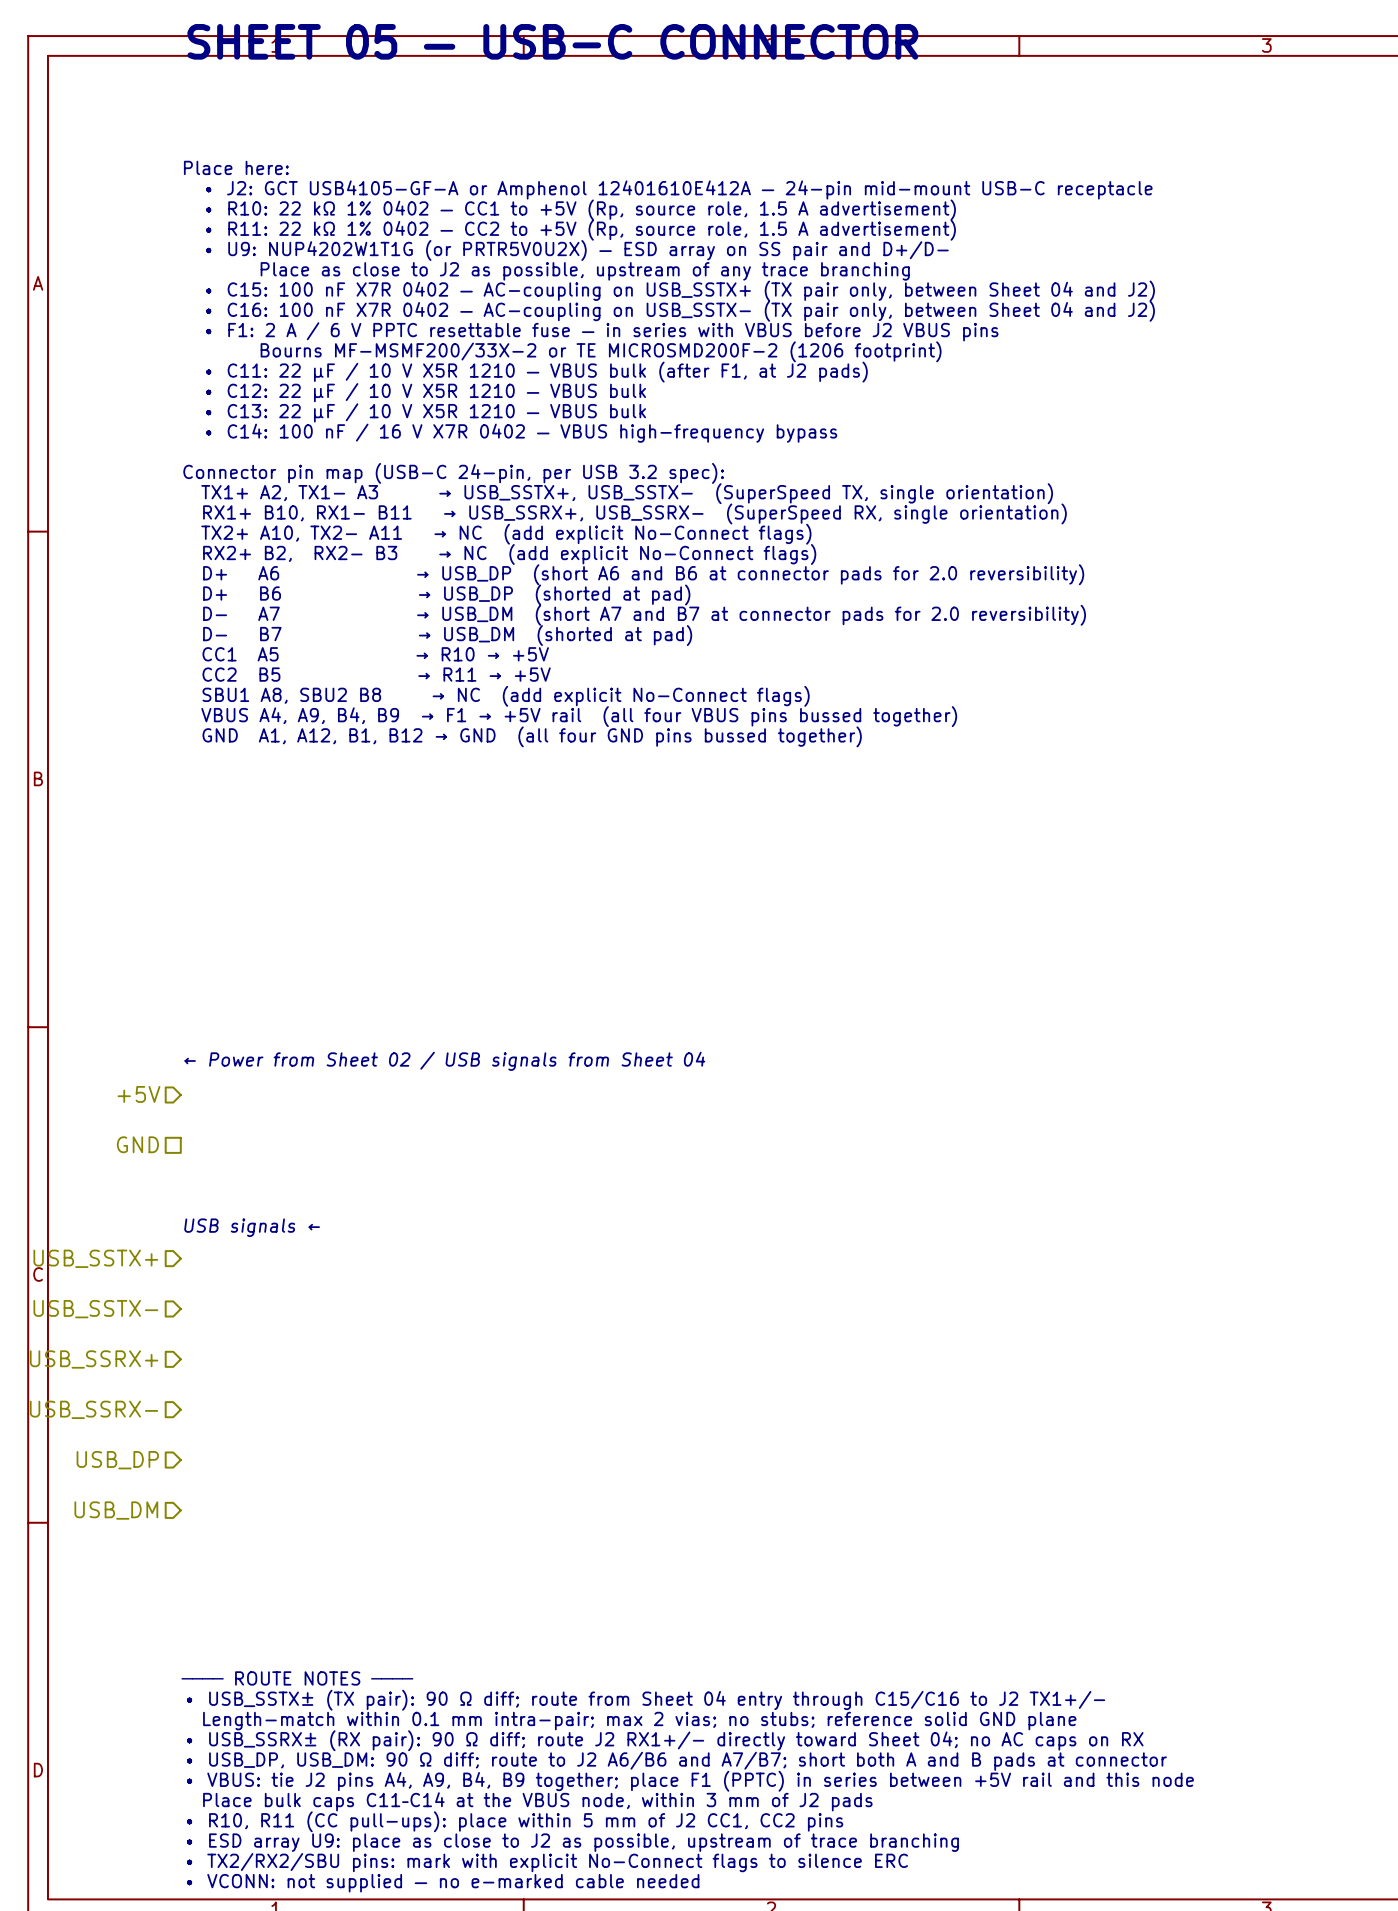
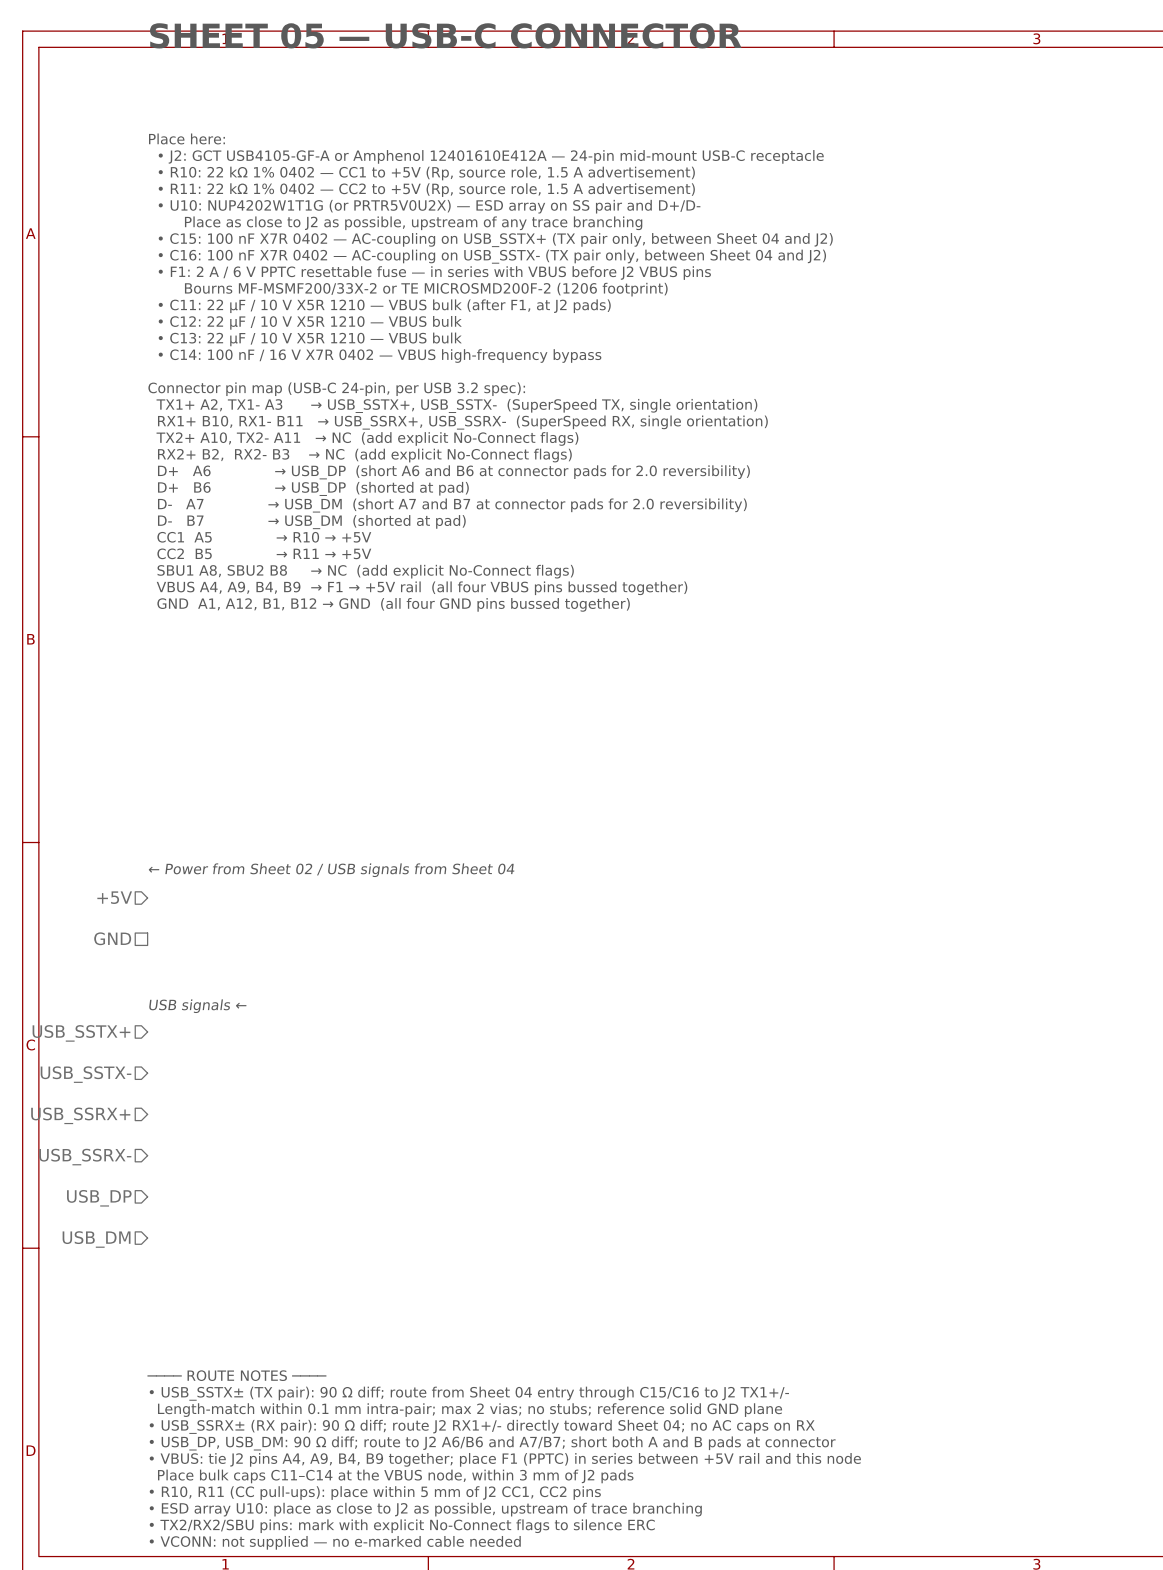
text: • U9: NUP4202W1T1G (or PRTR5V0U2X) — ESD array on SS pair and D+/D- (577, 250) -> • U10: NUP4202W1T1G (or PRTR5V0U2X) — ESD array on SS pair and D+/D- (429, 206)
text: • ESD array U9: place as close to J2 as possible, upstream of trace branching (572, 1842) -> • ESD array U10: place as close to J2 as possible, upstream of trace branching (425, 1509)

